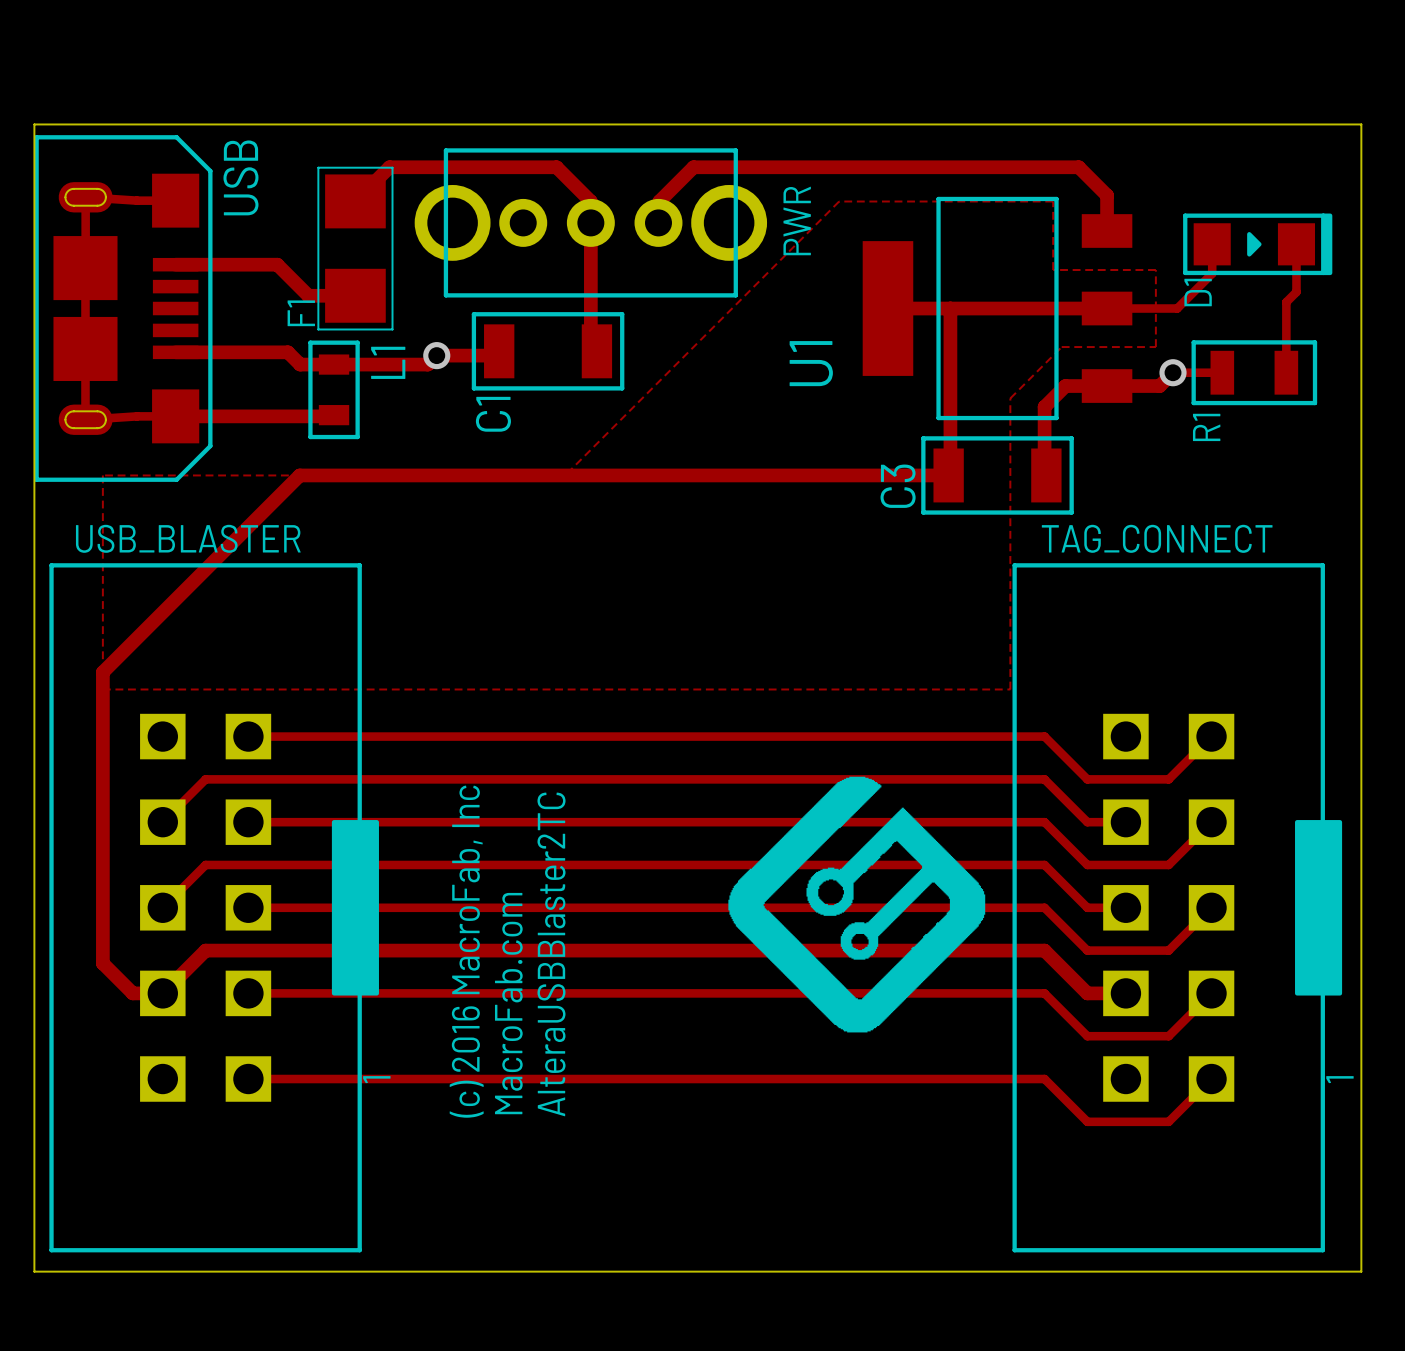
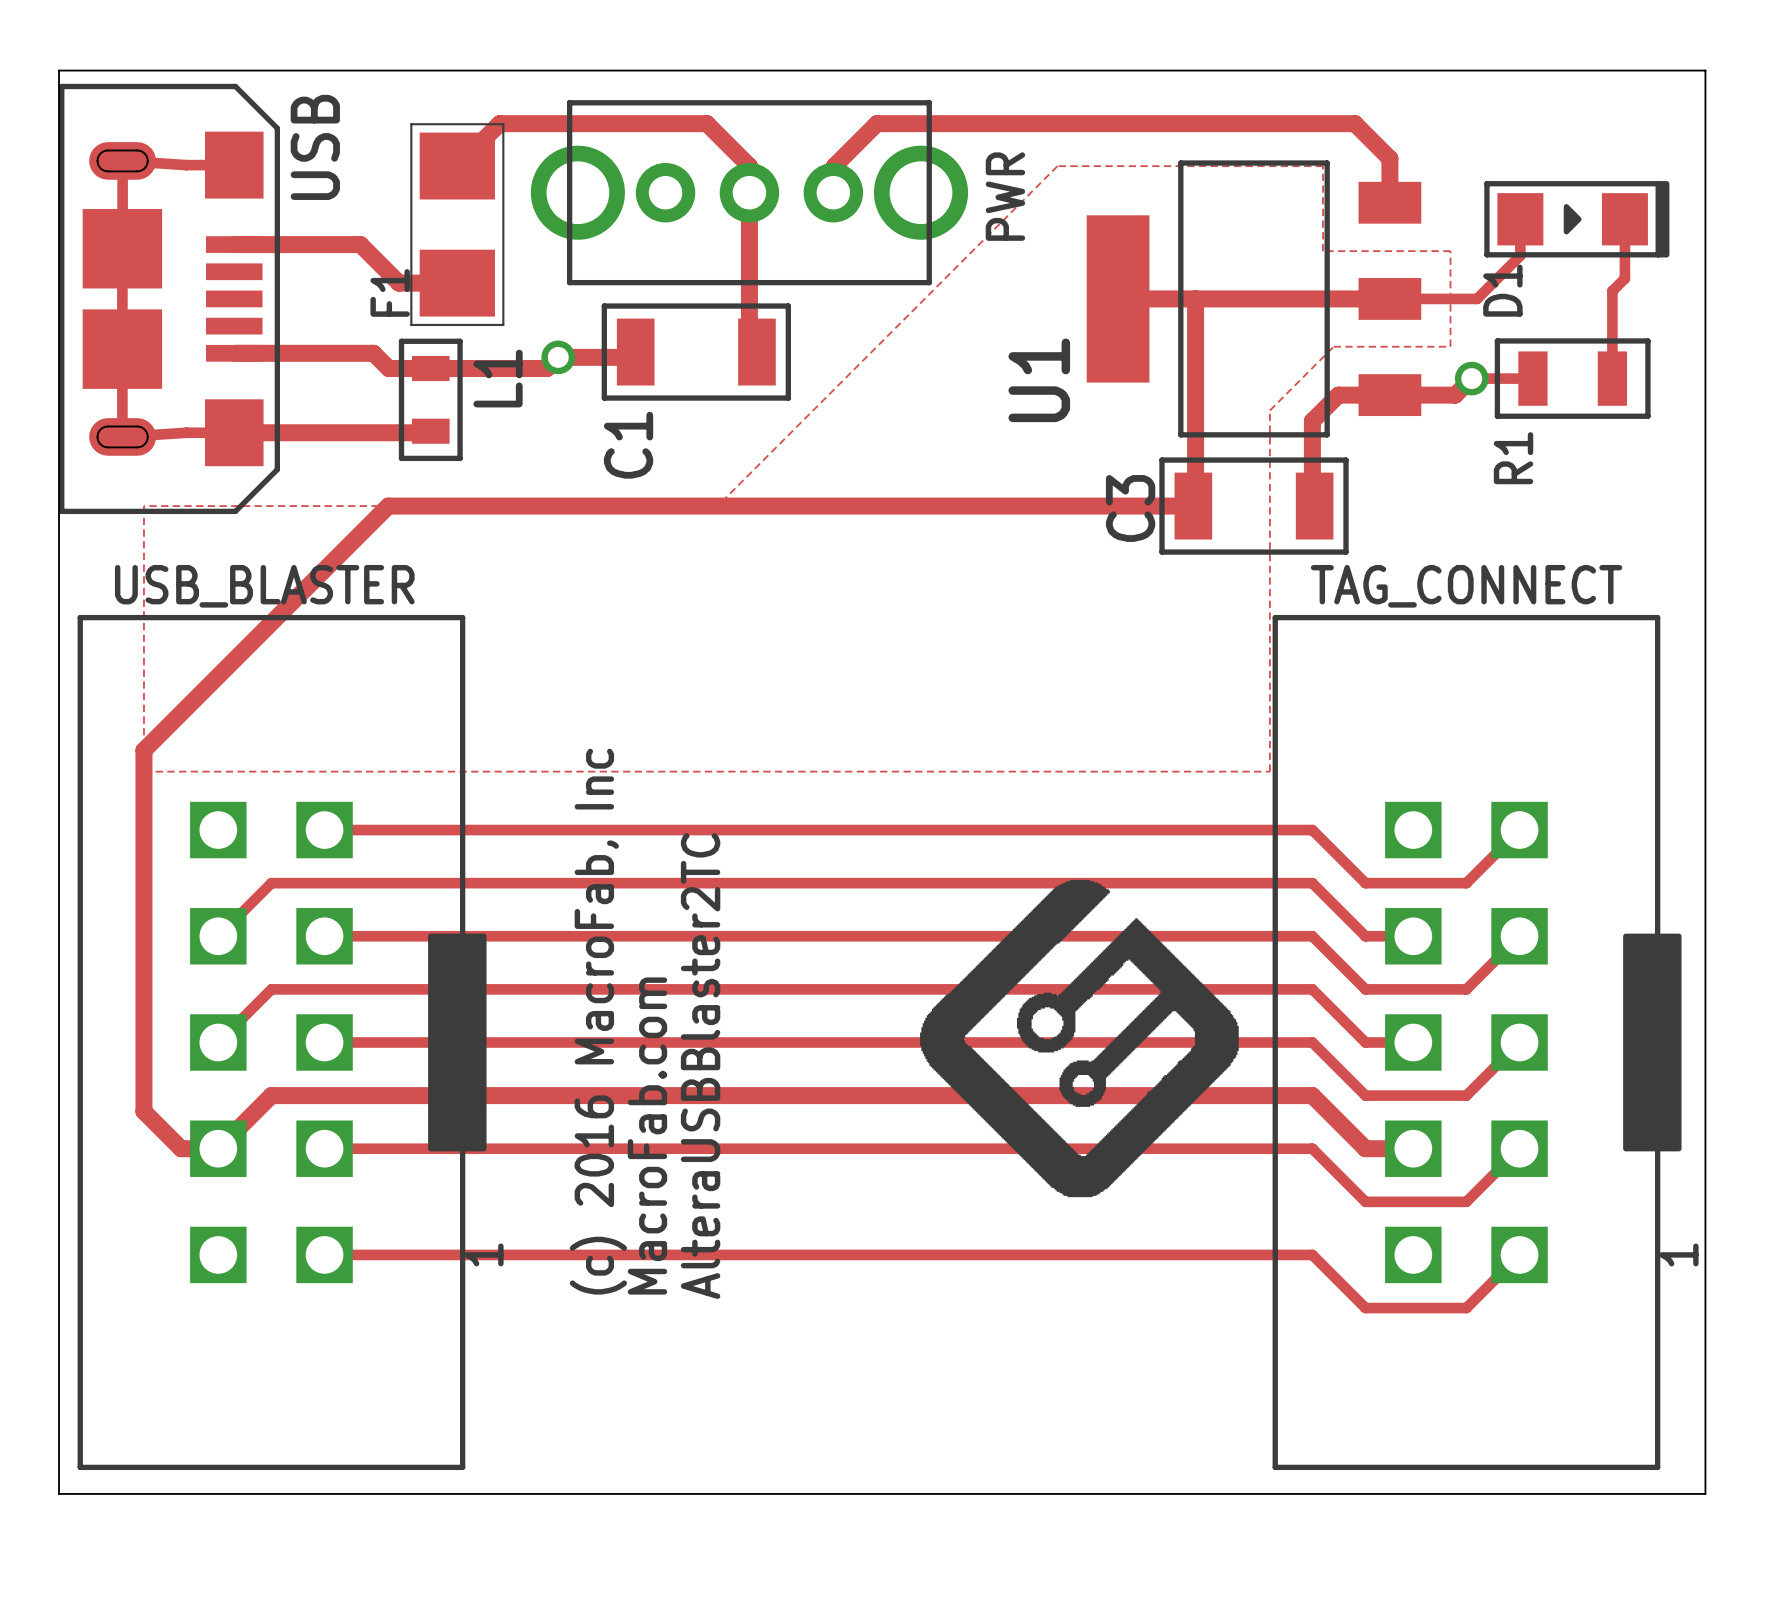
U1 name position: U1 (811, 363) -> U1 (1039, 380)

